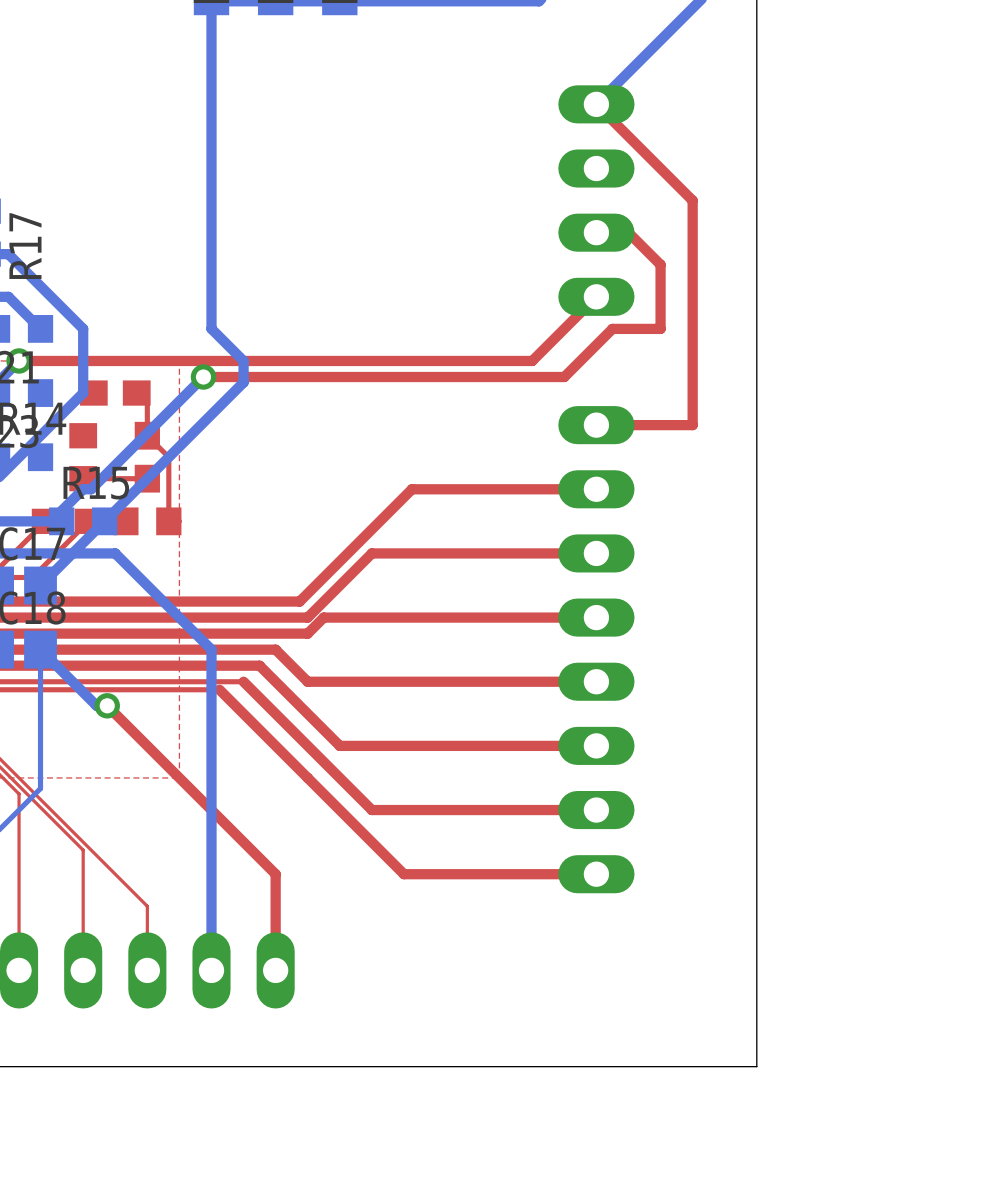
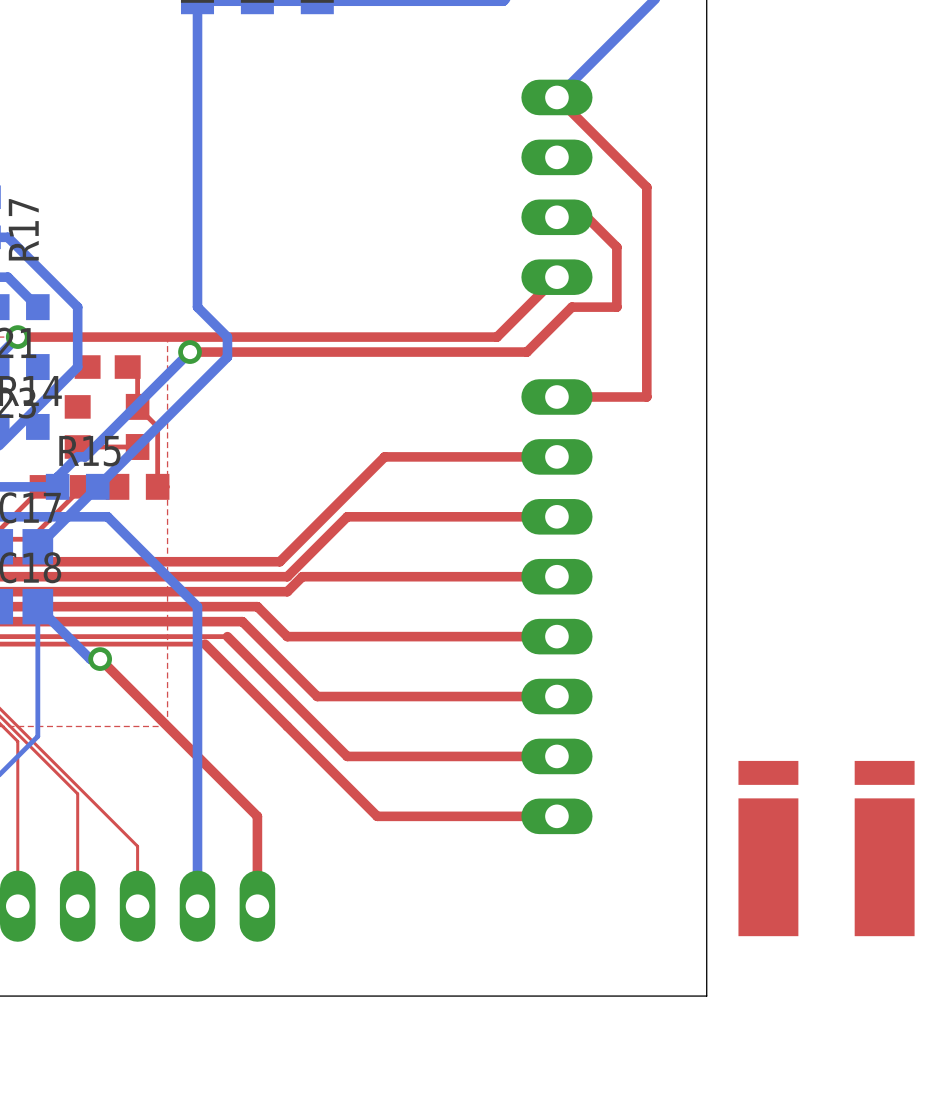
part: none -> (826, 848)

